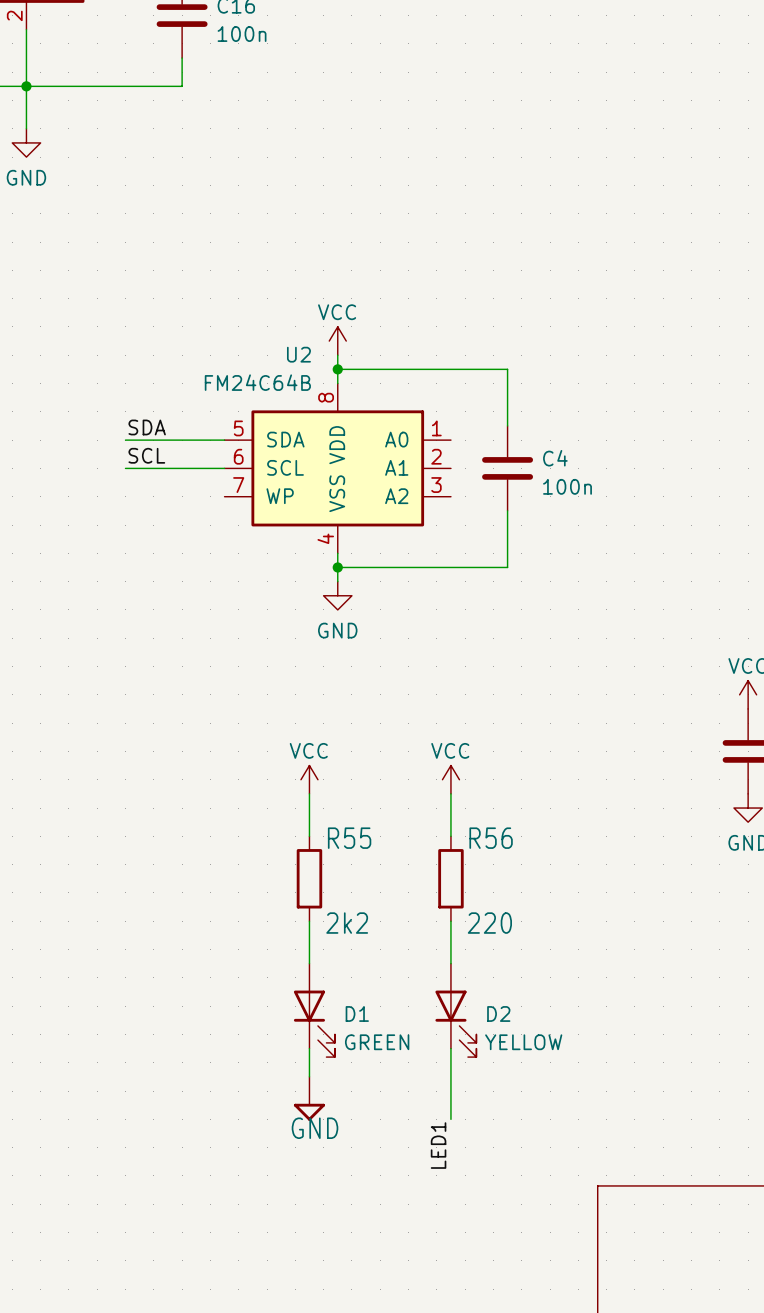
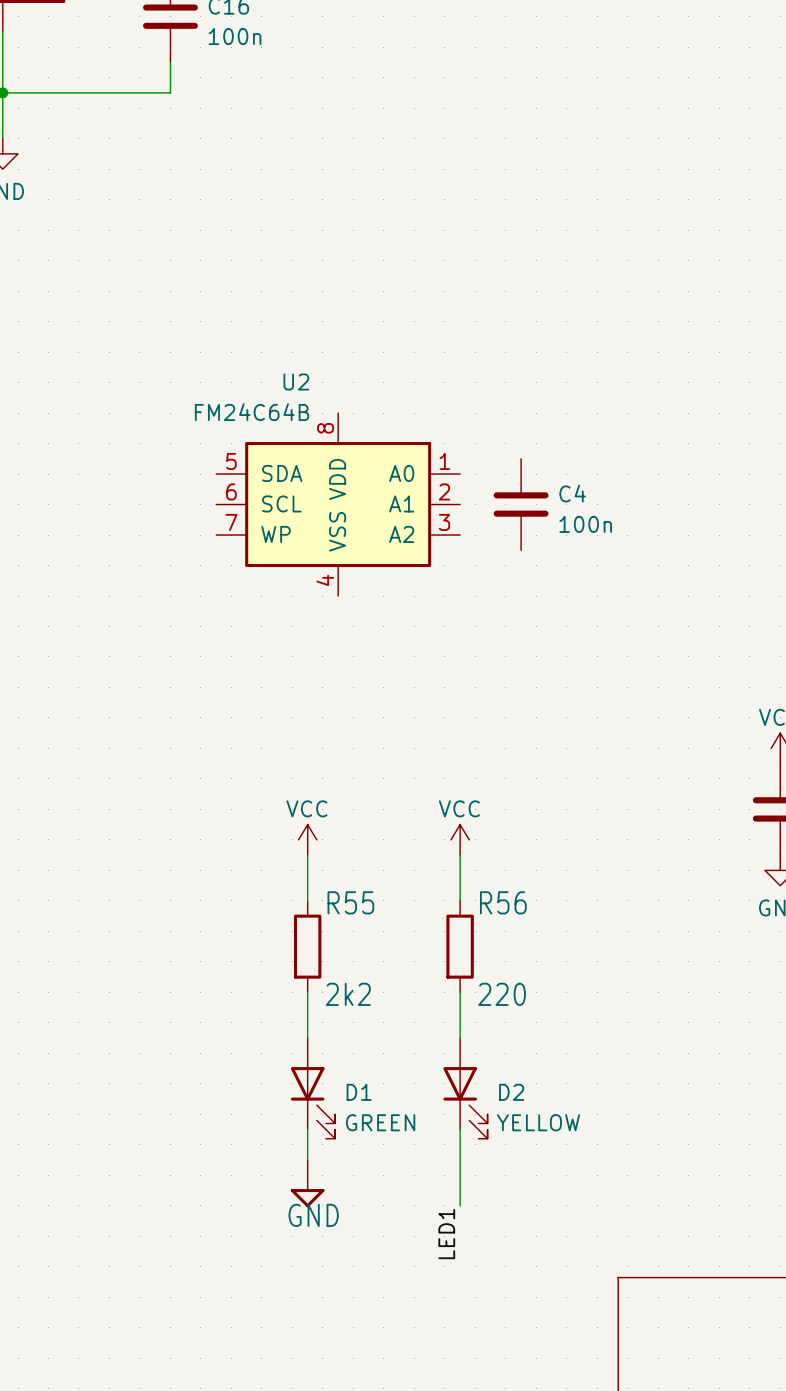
power symbol: VCC (337, 341) -> none
wire: (337, 355) (337, 383) -> none
wire: (337, 369) (507, 369) (507, 425) -> none
junction: (337, 369) -> none
label: SDA (147, 427) -> none
wire: (125, 440) (224, 440) -> none
label: SCL (146, 455) -> none
wire: (125, 468) (224, 468) -> none
wire: (507, 510) (507, 567) (337, 567) -> none
wire: (337, 553) (337, 581) -> none
junction: (337, 567) -> none
power symbol: GND (337, 595) -> none

